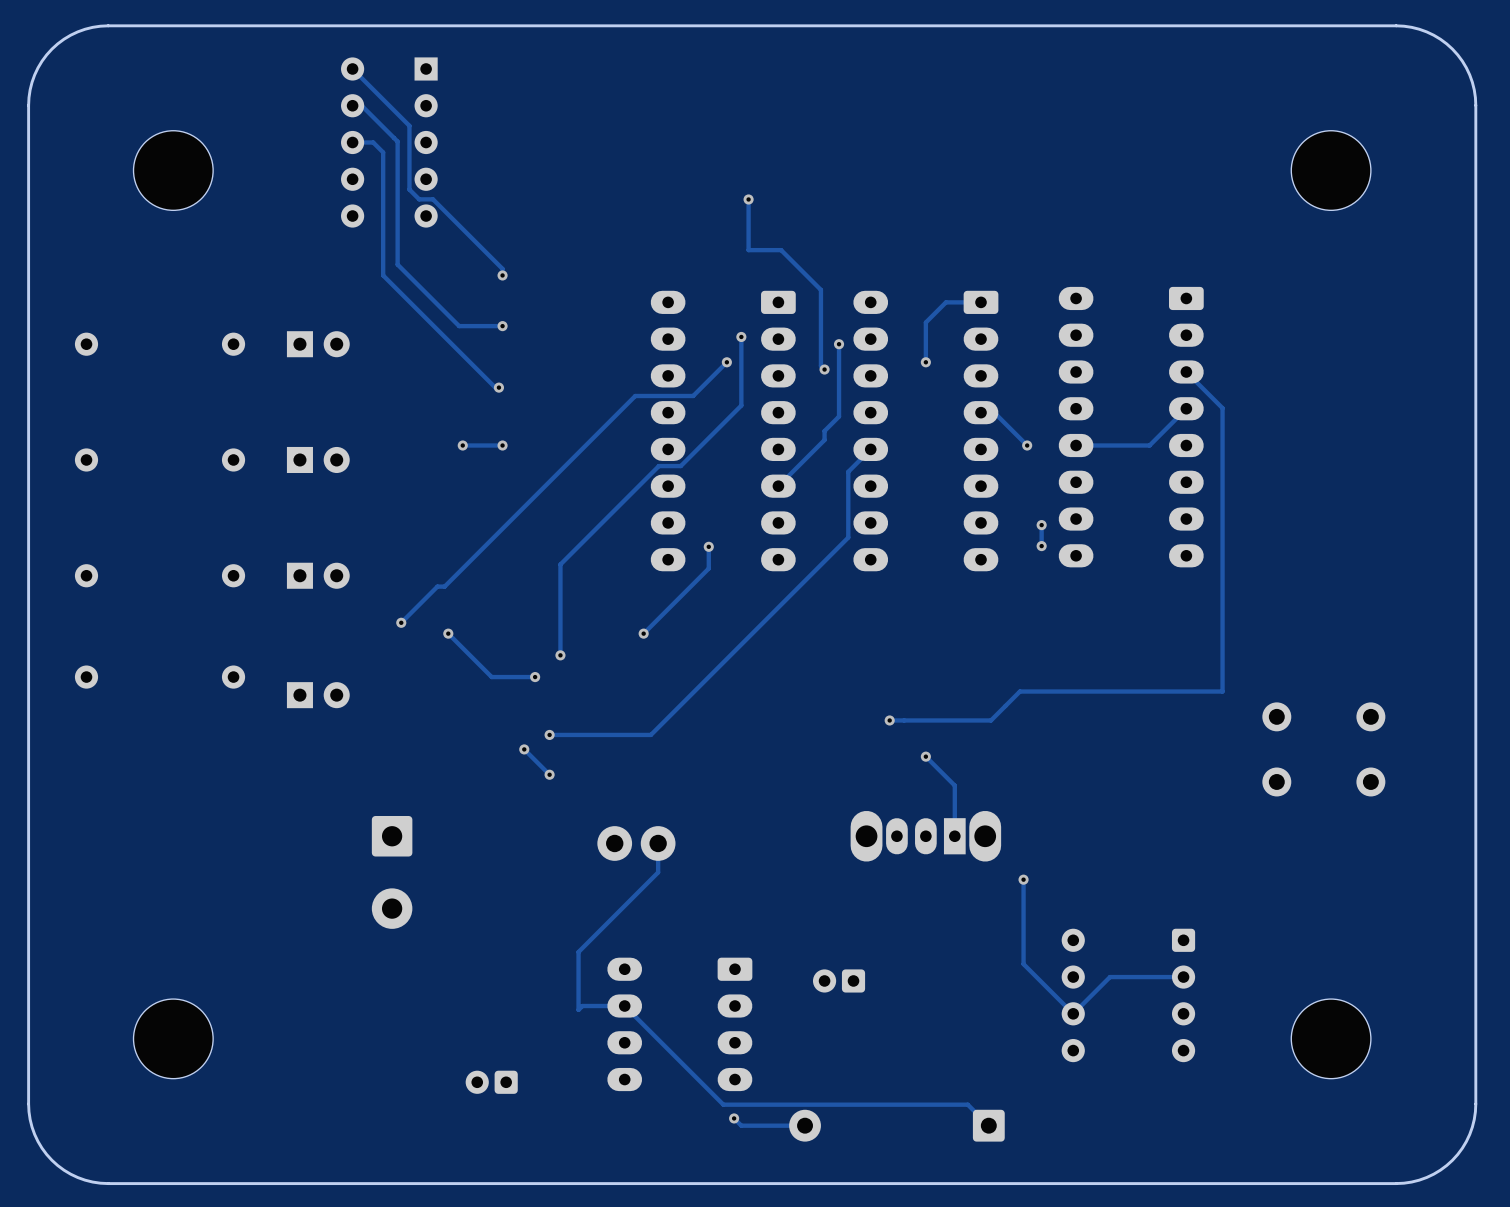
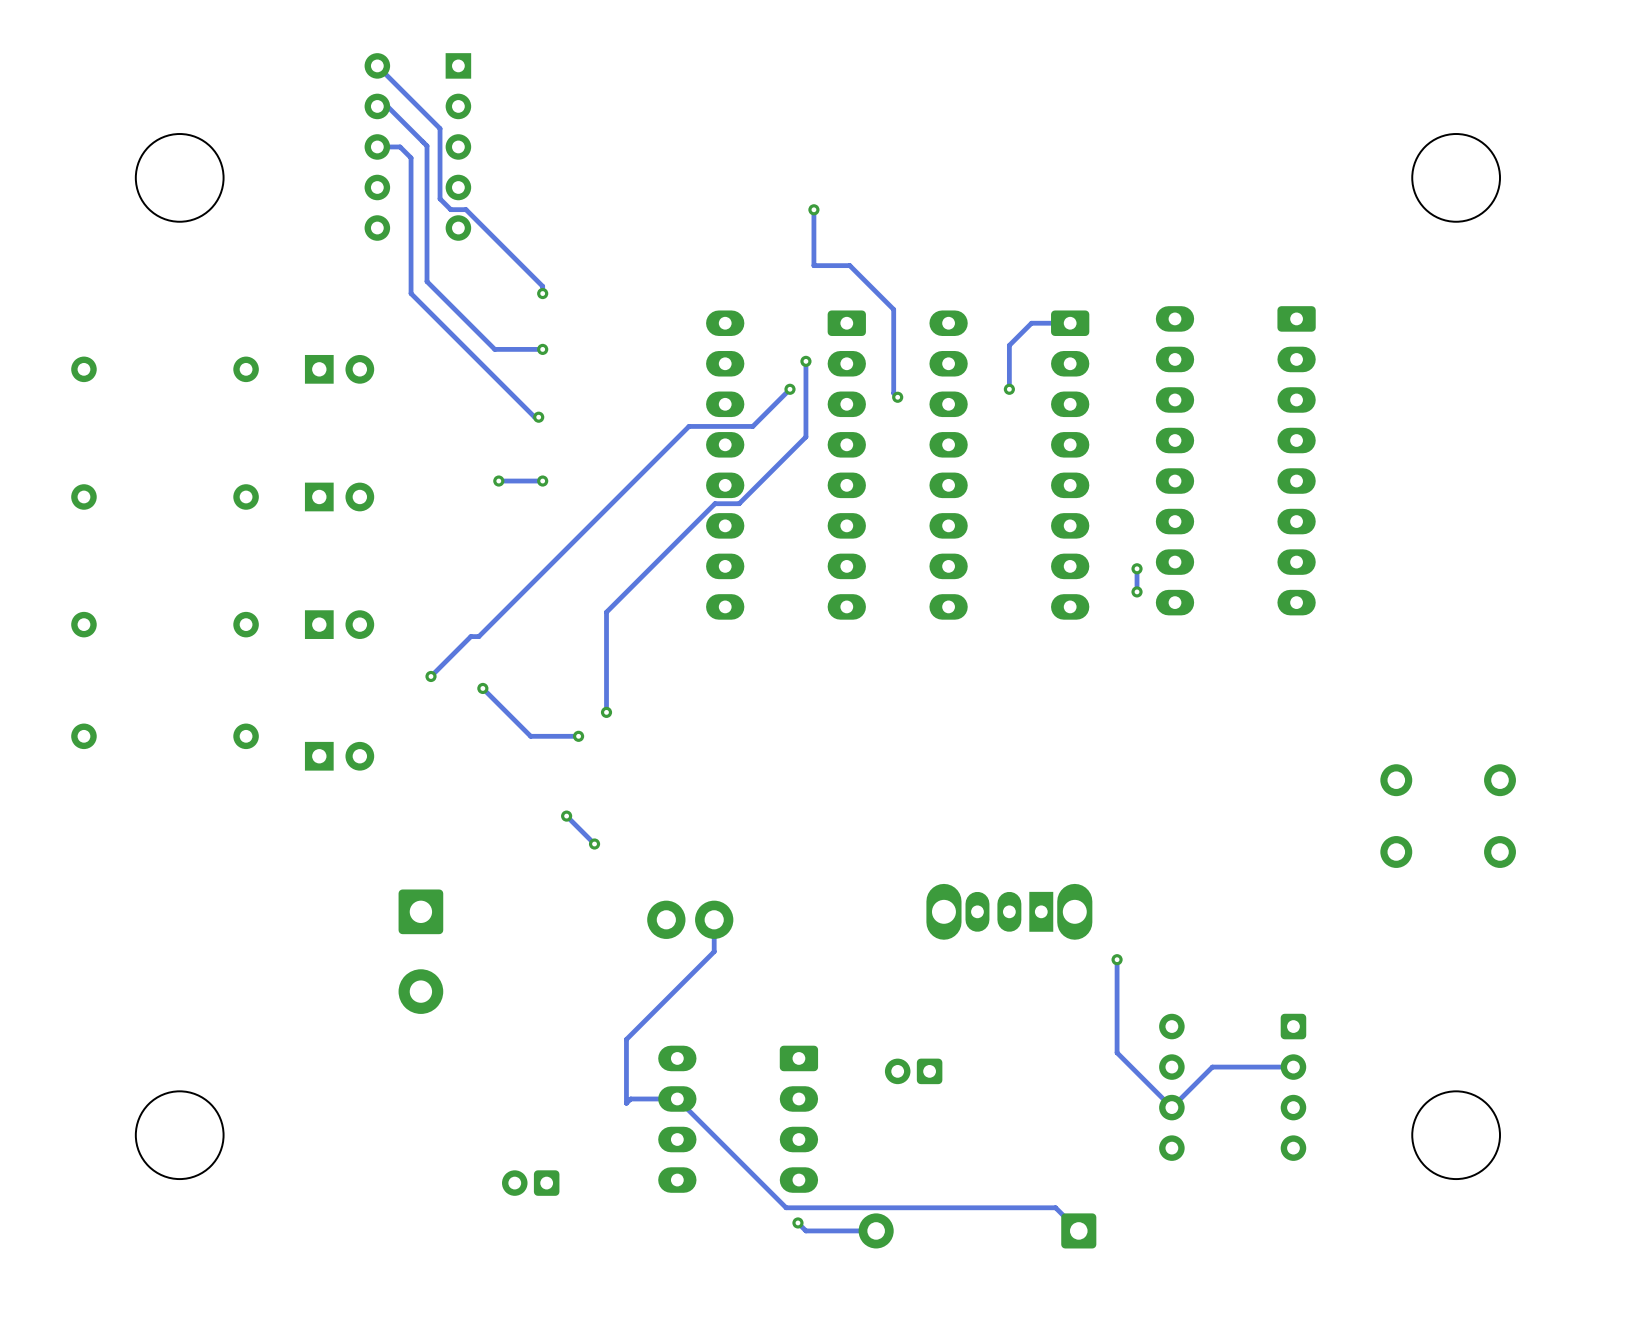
board edge: (1396, 25) (108, 25) (92, 27) (77, 31) (57, 43) (46, 54) (34, 74) (30, 89) (28, 105) (28, 1103) (30, 1119) (34, 1134) (46, 1154) (57, 1165) (70, 1174) (85, 1180) (108, 1183) (1396, 1183) (1411, 1182) (1426, 1177) (1446, 1165) (1457, 1154) (1469, 1134) (1474, 1119) (1475, 1103) (1475, 105) (1474, 89) (1469, 74) (1462, 61) (1452, 49) (1440, 39) (1426, 31) (1411, 27) (1396, 25) -> none
track: (839, 344) (839, 416) (824, 431) (824, 440) (778, 486) -> none
via: (839, 344) -> none
track: (1186, 371) (1222, 408) (1222, 691) (1019, 691) (990, 720) (889, 720) -> none
track: (1186, 408) (1149, 445) (1076, 445) -> none
track: (981, 412) (994, 412) (1027, 445) -> none
via: (1027, 445) -> none
track: (870, 449) (848, 471) (848, 537) (650, 734) (549, 734) -> none
track: (708, 546) (708, 568) (643, 633) -> none
via: (708, 546) -> none
via: (643, 633) -> none
via: (889, 720) -> none
via: (549, 734) -> none
track: (925, 756) (954, 785) (954, 836) -> none
via: (925, 756) -> none

